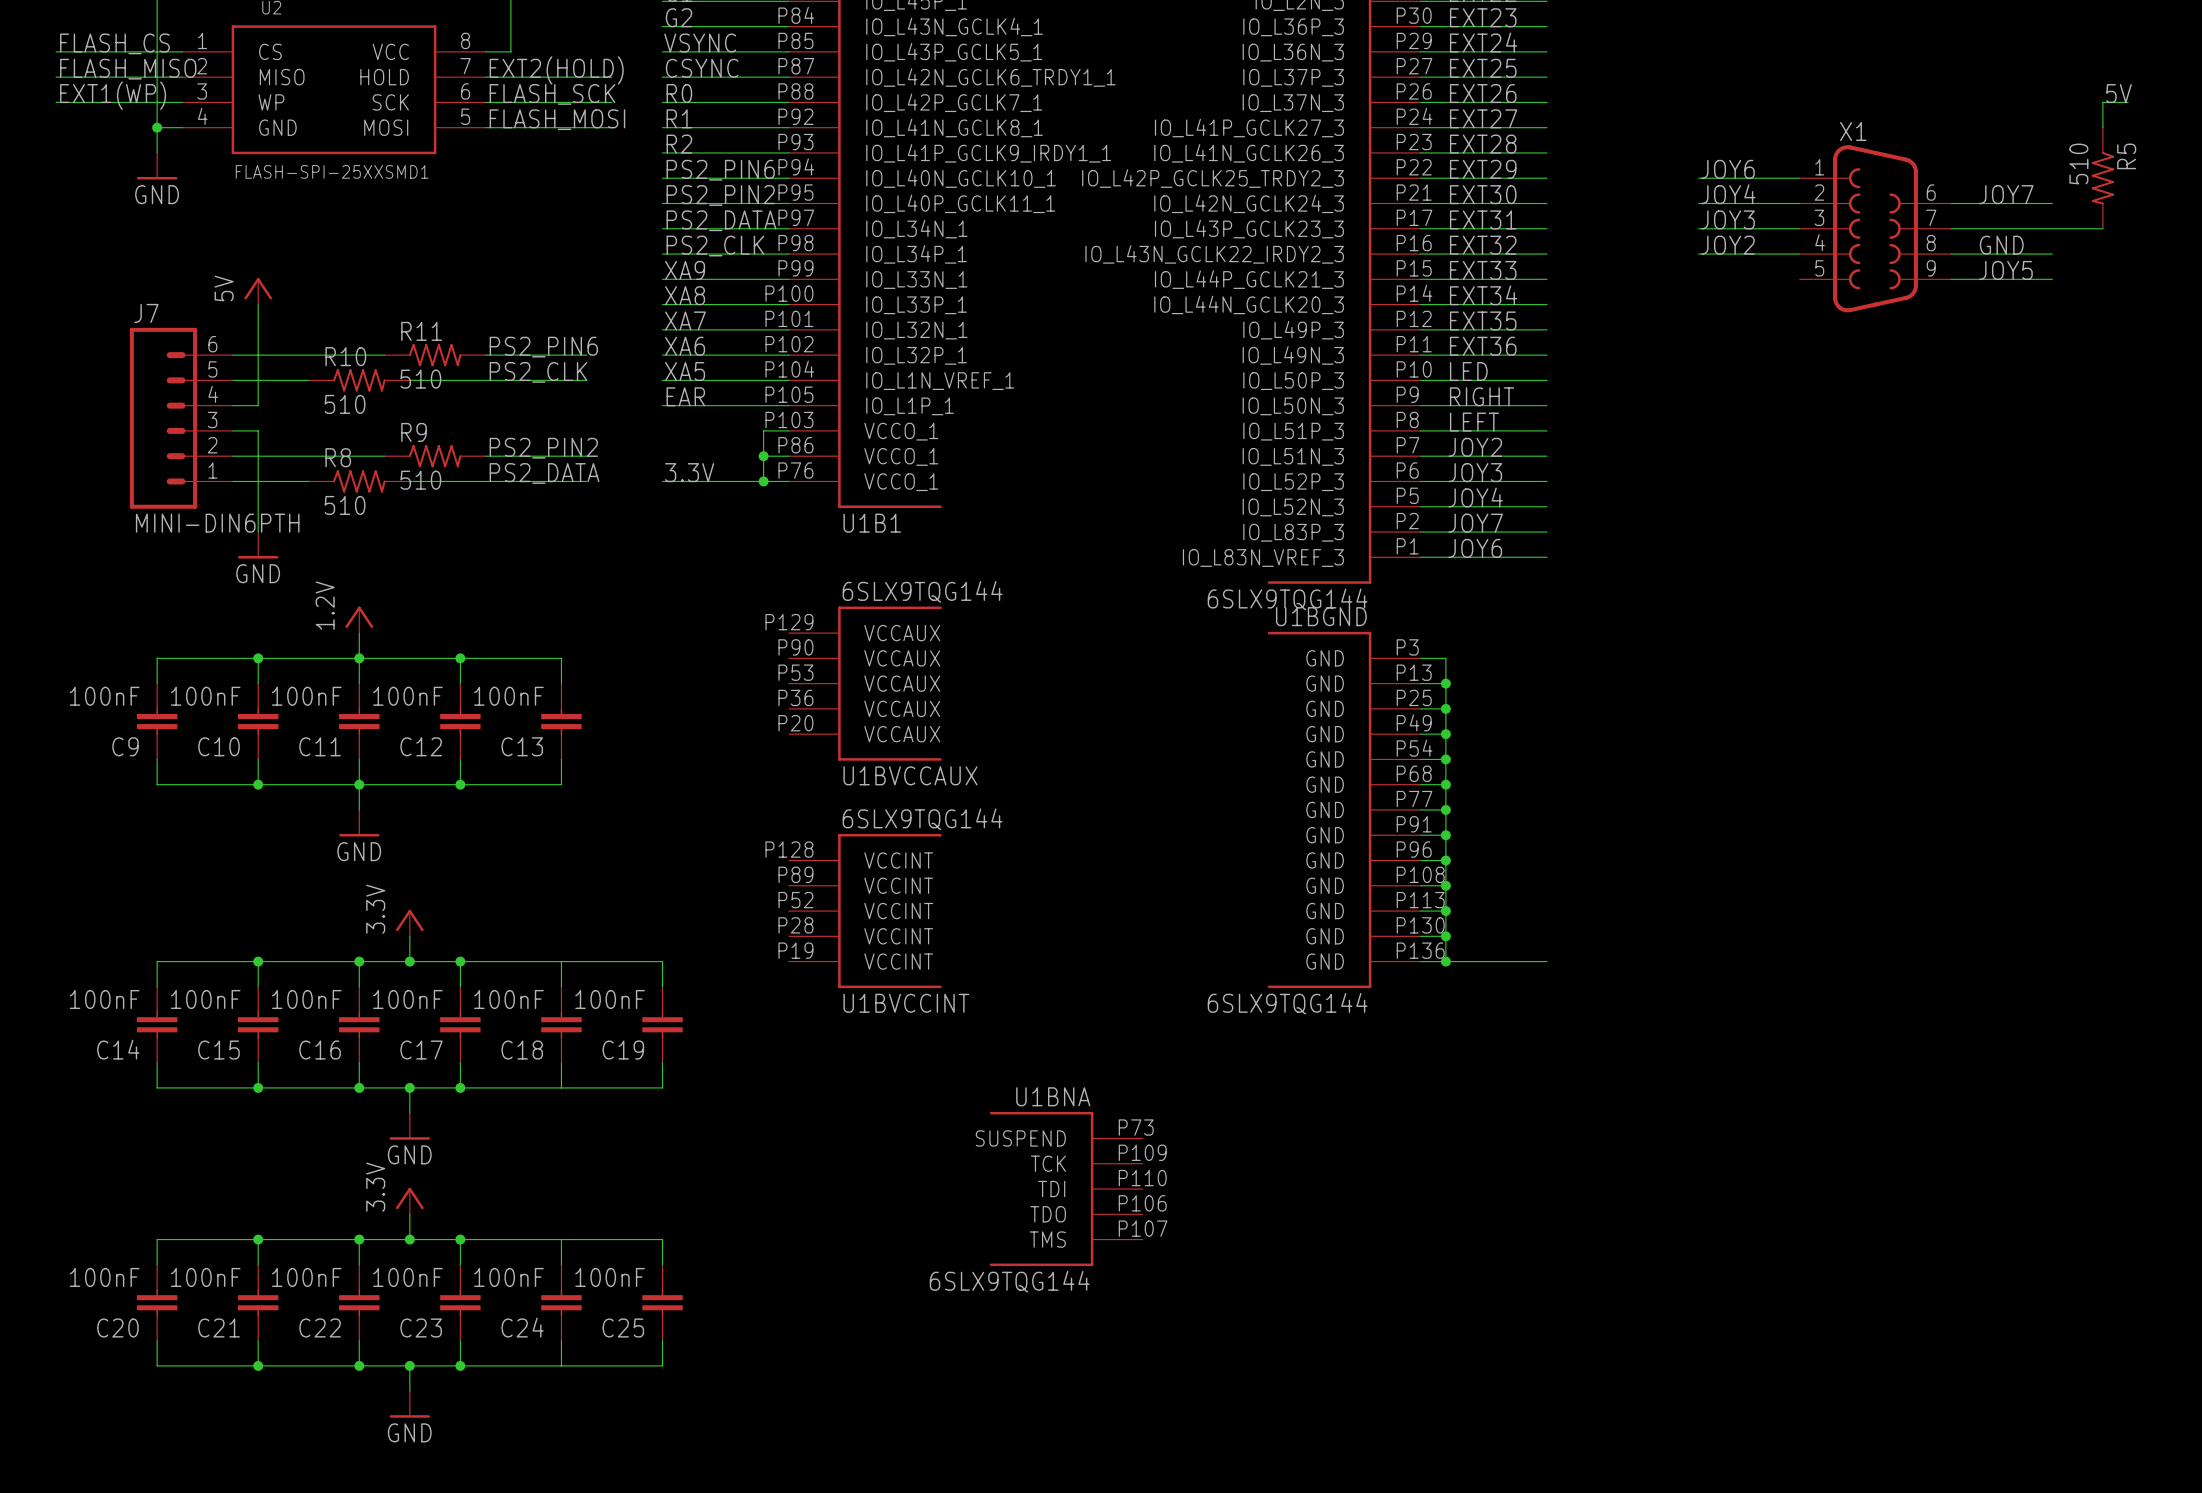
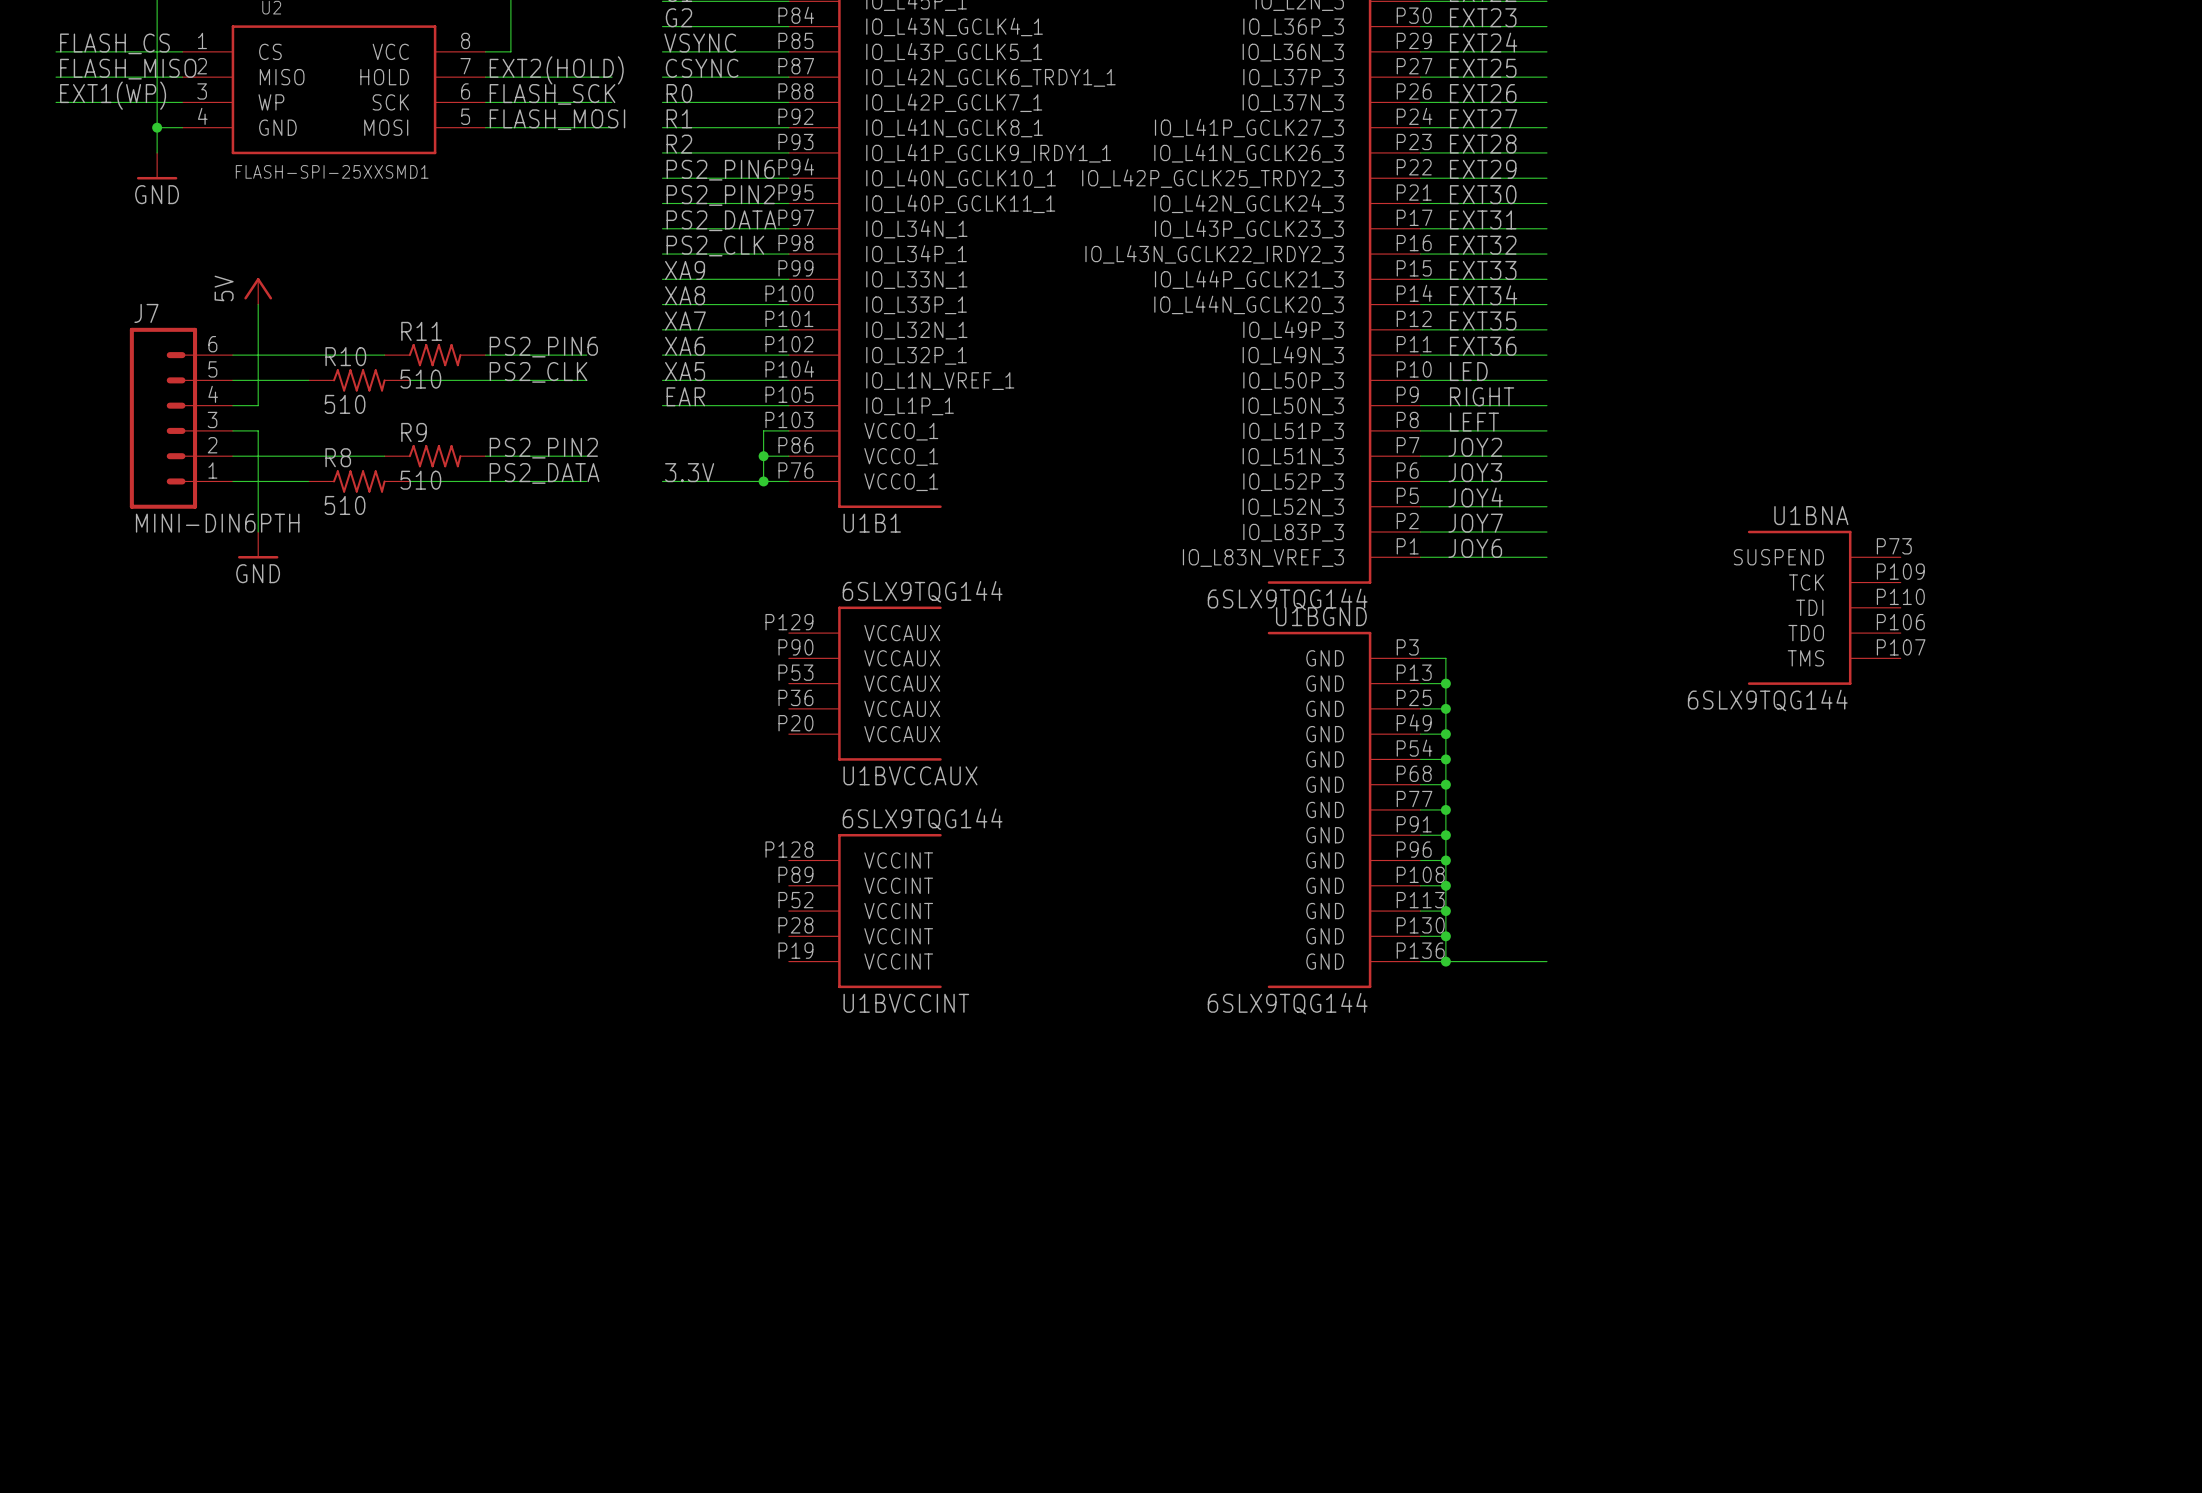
label: 5V (2118, 93) -> none
wire: (2128, 102) (2102, 102) (2102, 127) -> none
label: JOY6 (1727, 169) -> none
wire: (1698, 178) (1799, 178) -> none
R5: 510 (2102, 178) -> none
label: JOY4 (1728, 194) -> none
label: JOY7 (2006, 194) -> none
wire: (1698, 203) (1799, 203) -> none
wire: (1951, 203) (2052, 203) -> none
label: JOY3 (1727, 219) -> none
wire: (1698, 228) (1799, 228) -> none
X1: (1875, 228) -> none
wire: (1951, 228) (2102, 228) -> none
label: JOY2 (1727, 245) -> none
label: GND (2001, 245) -> none
wire: (1698, 254) (1799, 254) -> none
wire: (1951, 254) (2052, 254) -> none
label: JOY5 (2005, 270) -> none
wire: (1951, 279) (2052, 279) -> none
power symbol: 1.2V (359, 619) -> none
wire: (359, 633) (359, 683) -> none
wire: (258, 658) (258, 683) -> none
junction: (258, 658) -> none
junction: (359, 658) -> none
wire: (460, 658) (460, 683) -> none
junction: (460, 658) -> none
wire: (157, 683) (157, 658) (561, 658) (561, 683) -> none
C9: 100nF (157, 721) -> none
C10: 100nF (258, 721) -> none
C11: 100nF (359, 721) -> none
C12: 100nF (460, 721) -> none
C13: 100nF (561, 721) -> none
wire: (157, 759) (157, 784) (561, 784) (561, 759) -> none
wire: (258, 759) (258, 784) -> none
wire: (359, 759) (359, 809) -> none
wire: (460, 759) (460, 784) -> none
junction: (258, 784) -> none
junction: (359, 784) -> none
junction: (460, 784) -> none
power symbol: GND (359, 823) -> none
power symbol: 3.3V (409, 923) -> none
wire: (409, 936) (409, 961) -> none
wire: (258, 961) (258, 986) -> none
junction: (258, 961) -> none
wire: (359, 961) (359, 986) -> none
junction: (359, 961) -> none
junction: (409, 961) -> none
wire: (460, 961) (460, 986) -> none
junction: (460, 961) -> none
wire: (561, 961) (561, 986) -> none
wire: (157, 986) (157, 961) (662, 961) (662, 986) -> none
C14: 100nF (157, 1024) -> none
C15: 100nF (258, 1024) -> none
C16: 100nF (359, 1024) -> none
C17: 100nF (460, 1024) -> none
C18: 100nF (561, 1024) -> none
C19: 100nF (662, 1024) -> none
wire: (157, 1062) (157, 1087) (662, 1087) (662, 1062) -> none
wire: (258, 1062) (258, 1087) -> none
wire: (359, 1062) (359, 1087) -> none
wire: (460, 1062) (460, 1087) -> none
wire: (561, 1062) (561, 1087) -> none
junction: (258, 1087) -> none
junction: (359, 1087) -> none
wire: (409, 1087) (409, 1113) -> none
junction: (409, 1087) -> none
junction: (460, 1087) -> none
power symbol: GND (409, 1126) -> none
U1BNA position: (1066, 1189) -> (1824, 607)
power symbol: 3.3V (409, 1201) -> none
wire: (409, 1214) (409, 1239) -> none
wire: (258, 1239) (258, 1264) -> none
junction: (258, 1239) -> none
wire: (359, 1239) (359, 1264) -> none
junction: (359, 1239) -> none
junction: (409, 1239) -> none
wire: (460, 1239) (460, 1264) -> none
junction: (460, 1239) -> none
wire: (561, 1239) (561, 1264) -> none
wire: (157, 1264) (157, 1239) (662, 1239) (662, 1264) -> none
C20: 100nF (157, 1302) -> none
C21: 100nF (258, 1302) -> none
C22: 100nF (359, 1302) -> none
C23: 100nF (460, 1302) -> none
C24: 100nF (561, 1302) -> none
C25: 100nF (662, 1302) -> none
wire: (157, 1340) (157, 1365) (662, 1365) (662, 1340) -> none
wire: (258, 1340) (258, 1365) -> none
wire: (359, 1340) (359, 1365) -> none
wire: (460, 1340) (460, 1365) -> none
wire: (561, 1340) (561, 1365) -> none
junction: (258, 1365) -> none
junction: (359, 1365) -> none
wire: (409, 1365) (409, 1391) -> none
junction: (409, 1365) -> none
junction: (460, 1365) -> none
power symbol: GND (409, 1404) -> none

